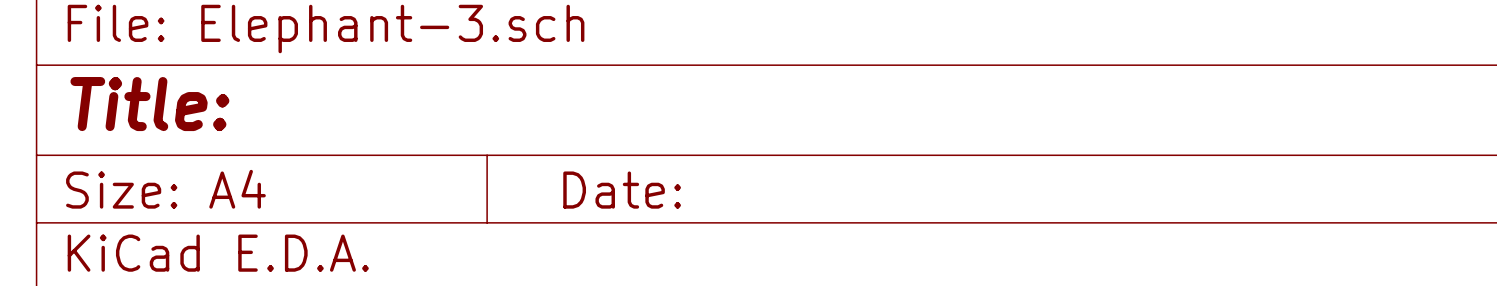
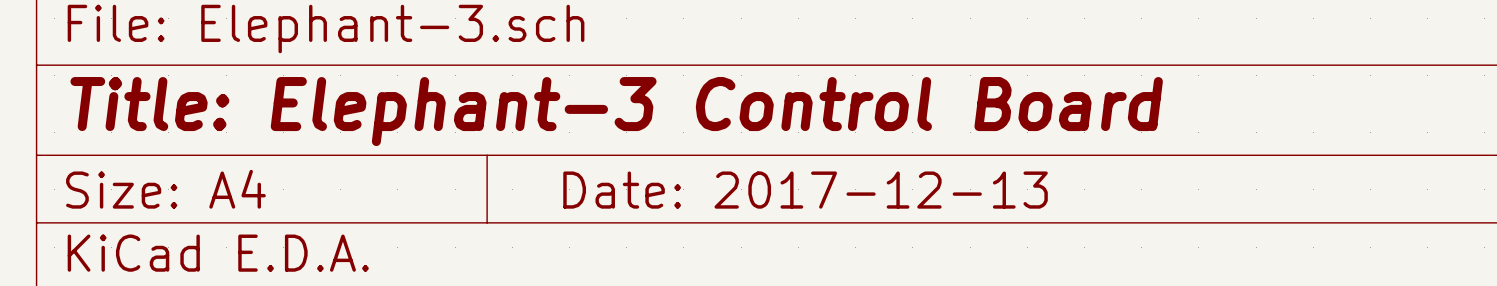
title block: Title: (149, 104) -> Title: Elephant-3 Control Board (616, 111)
title block: Date: (622, 190) -> Date: 2017-12-13 (805, 190)

